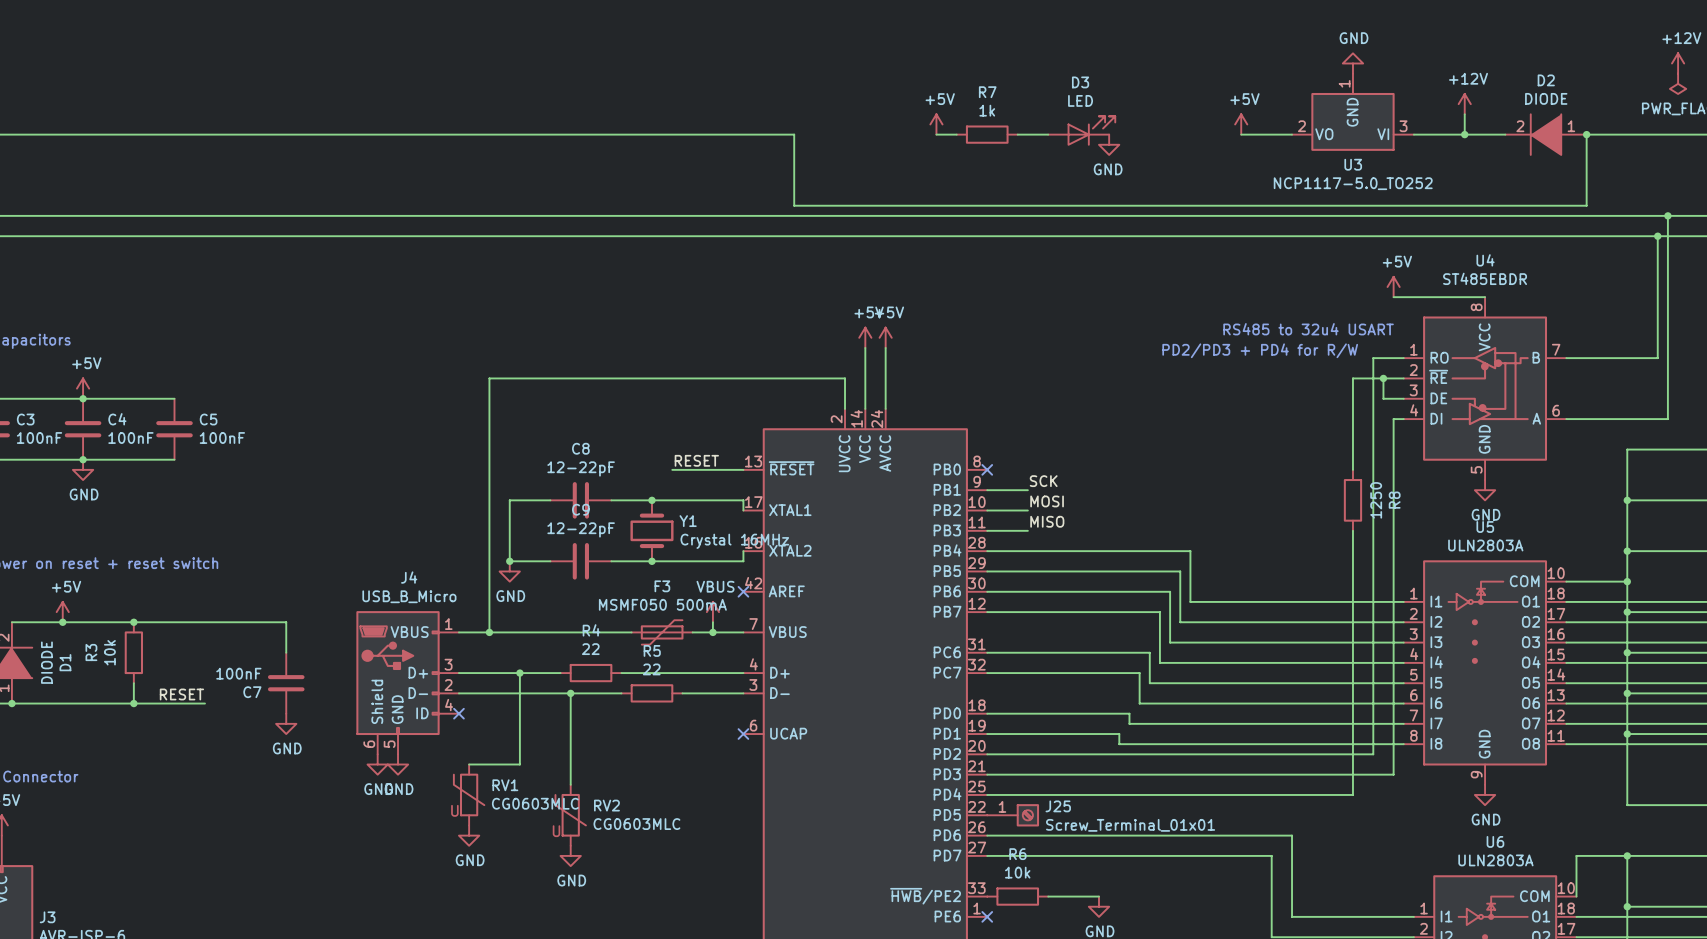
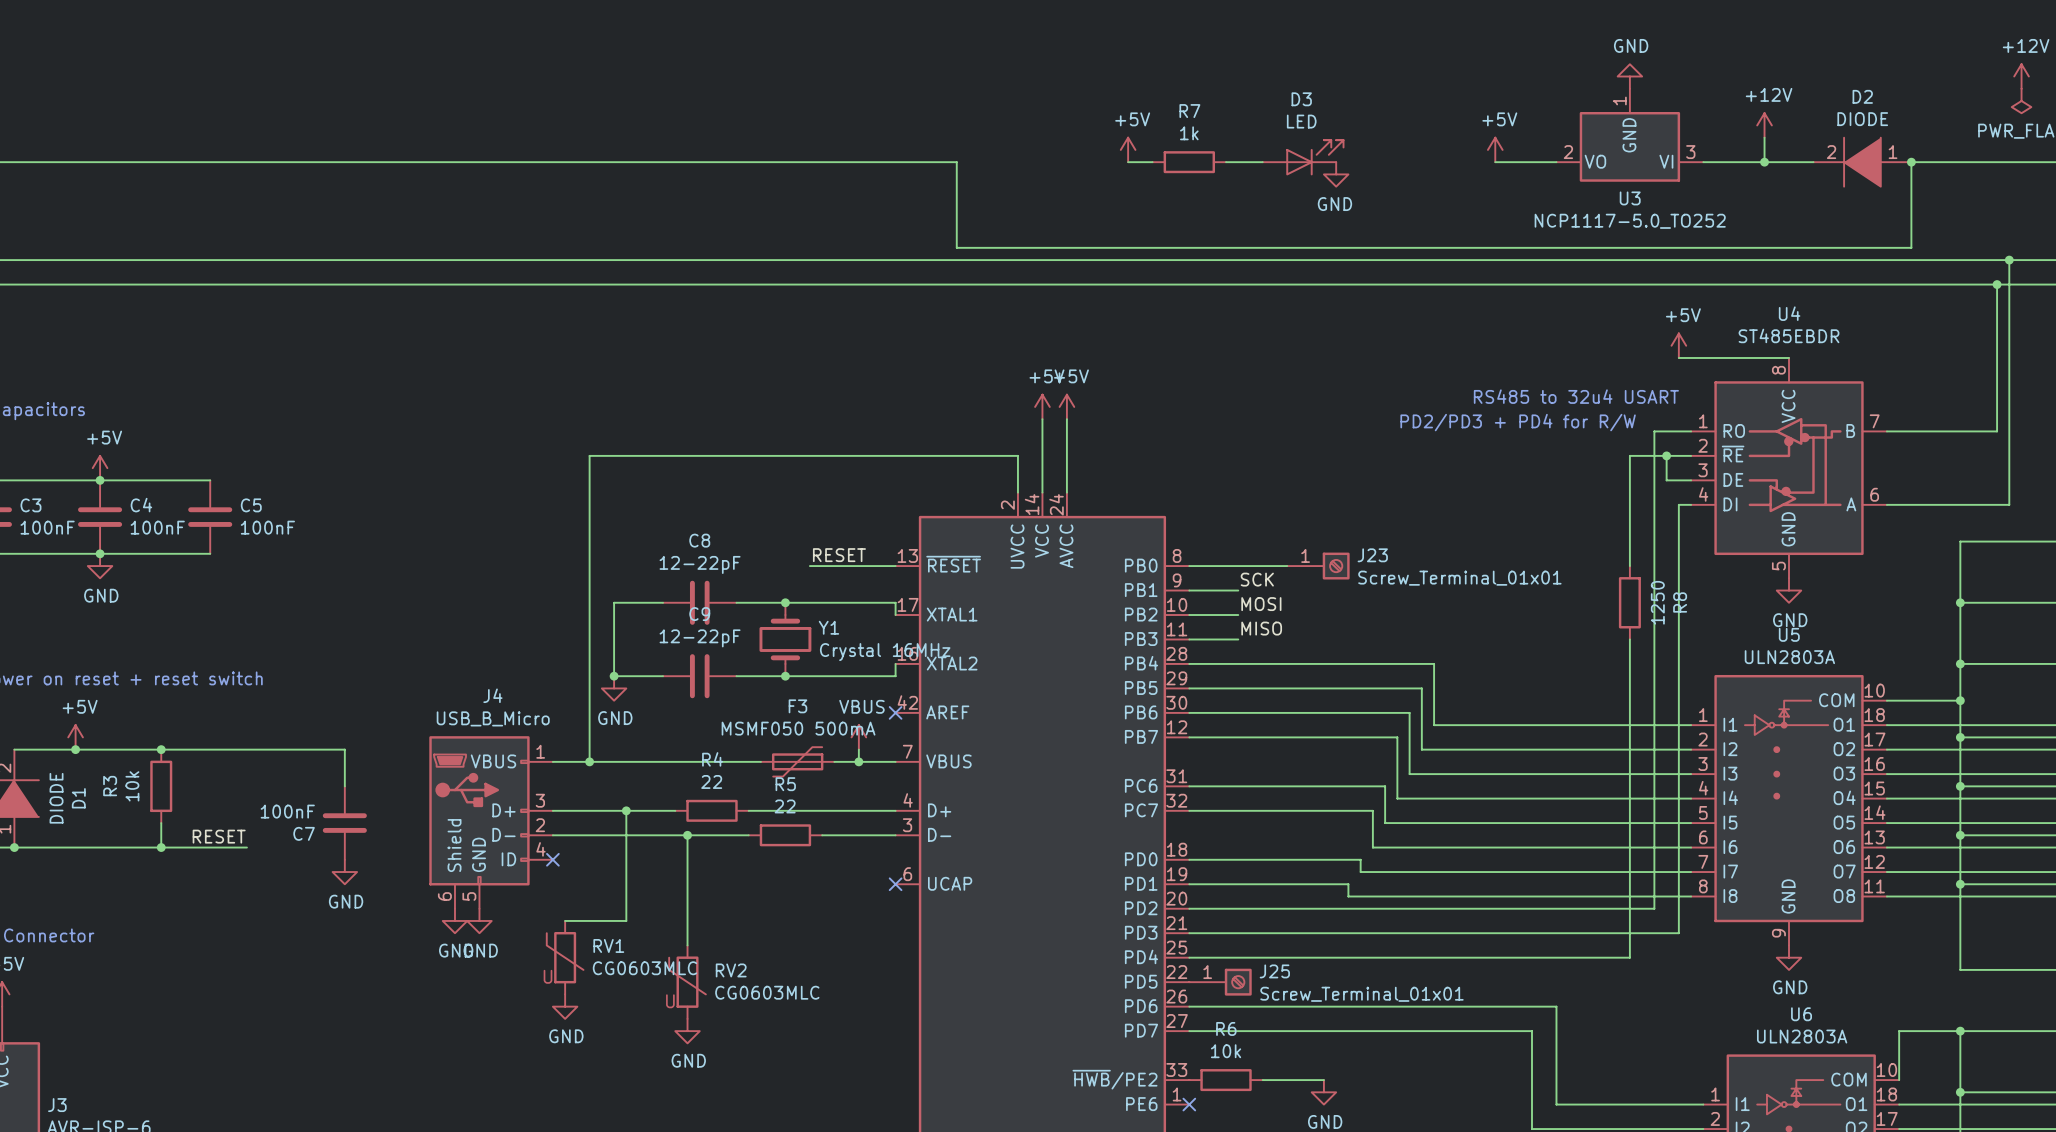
wire: none -> (1189, 566) (1287, 566)
no-connect mark: (987, 469) -> none
J23: none -> Screw_Terminal_01x01 (1318, 566)

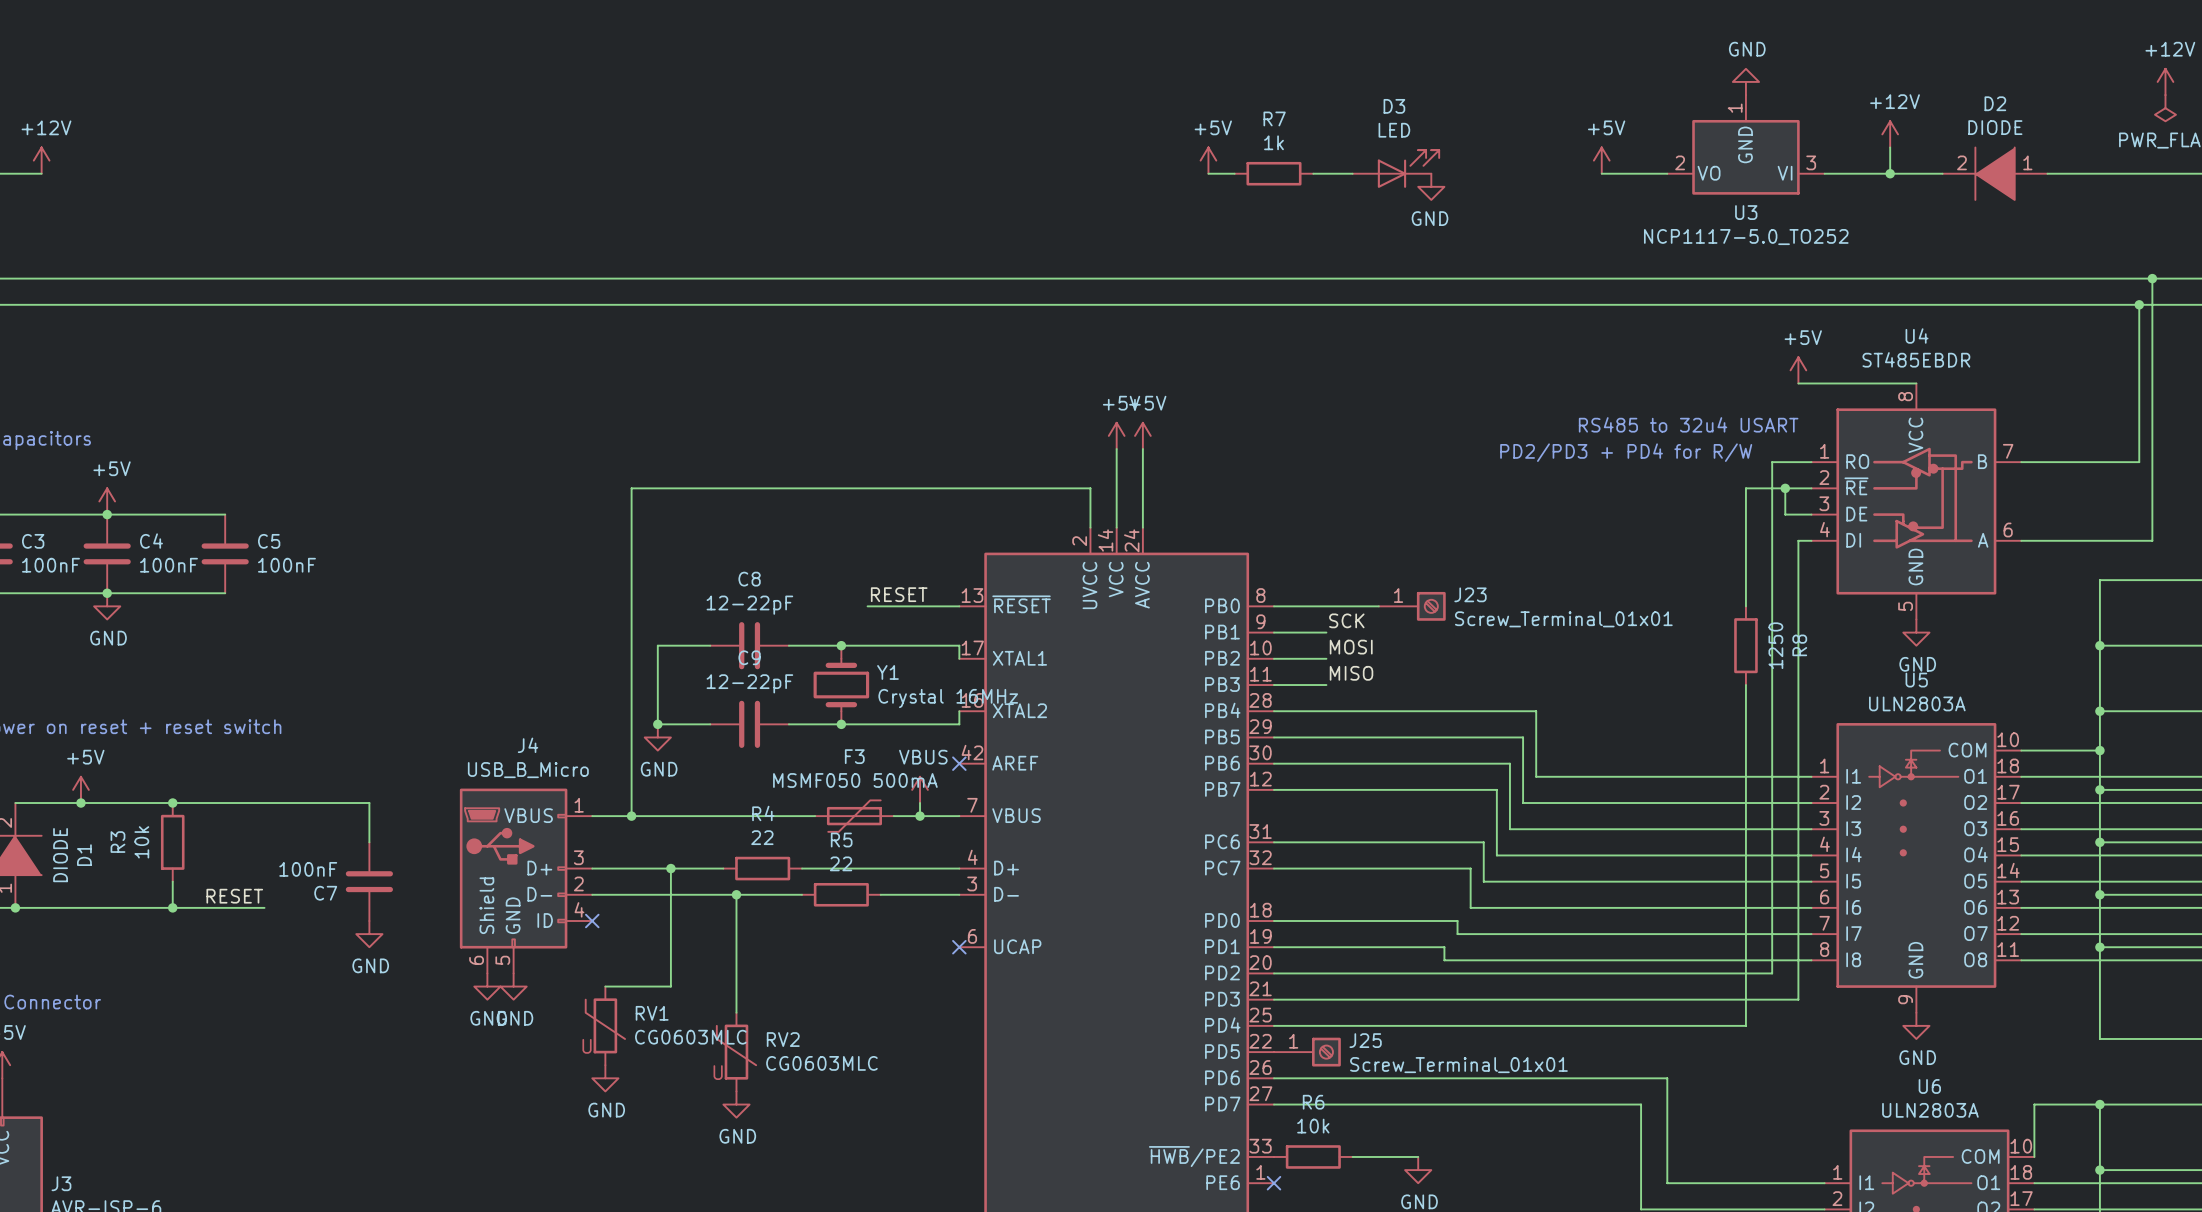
power symbol: none -> +12V (41, 160)
wire: (38, 162) (956, 162) (956, 247) (1911, 247) (1911, 162) -> none
junction: (1911, 162) -> none

